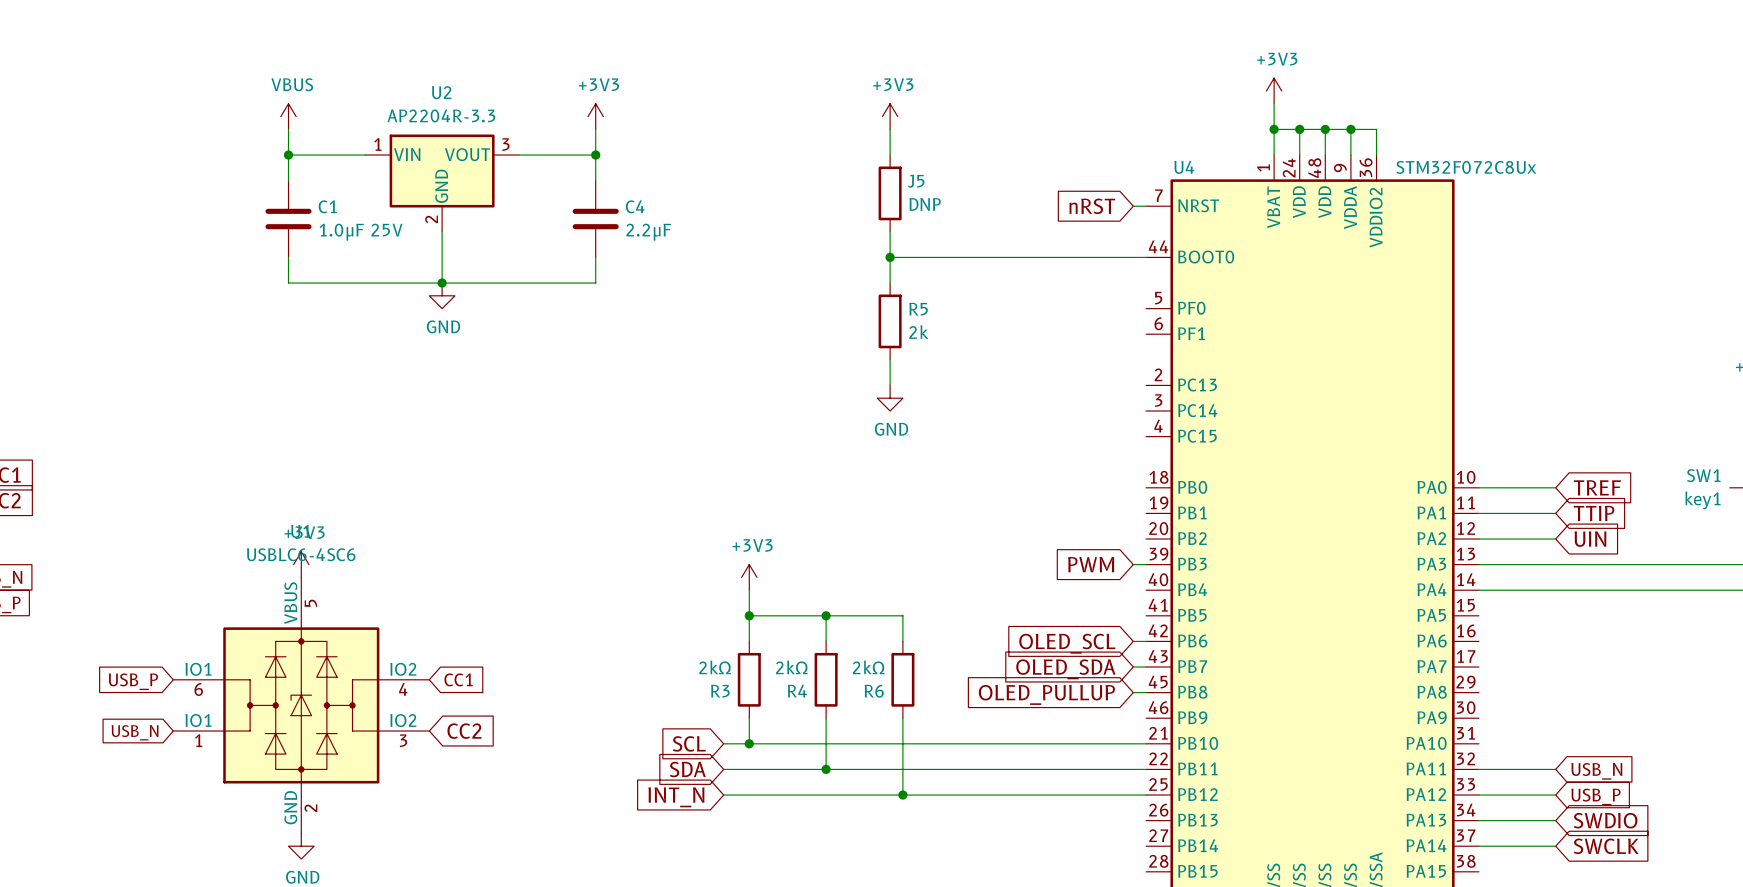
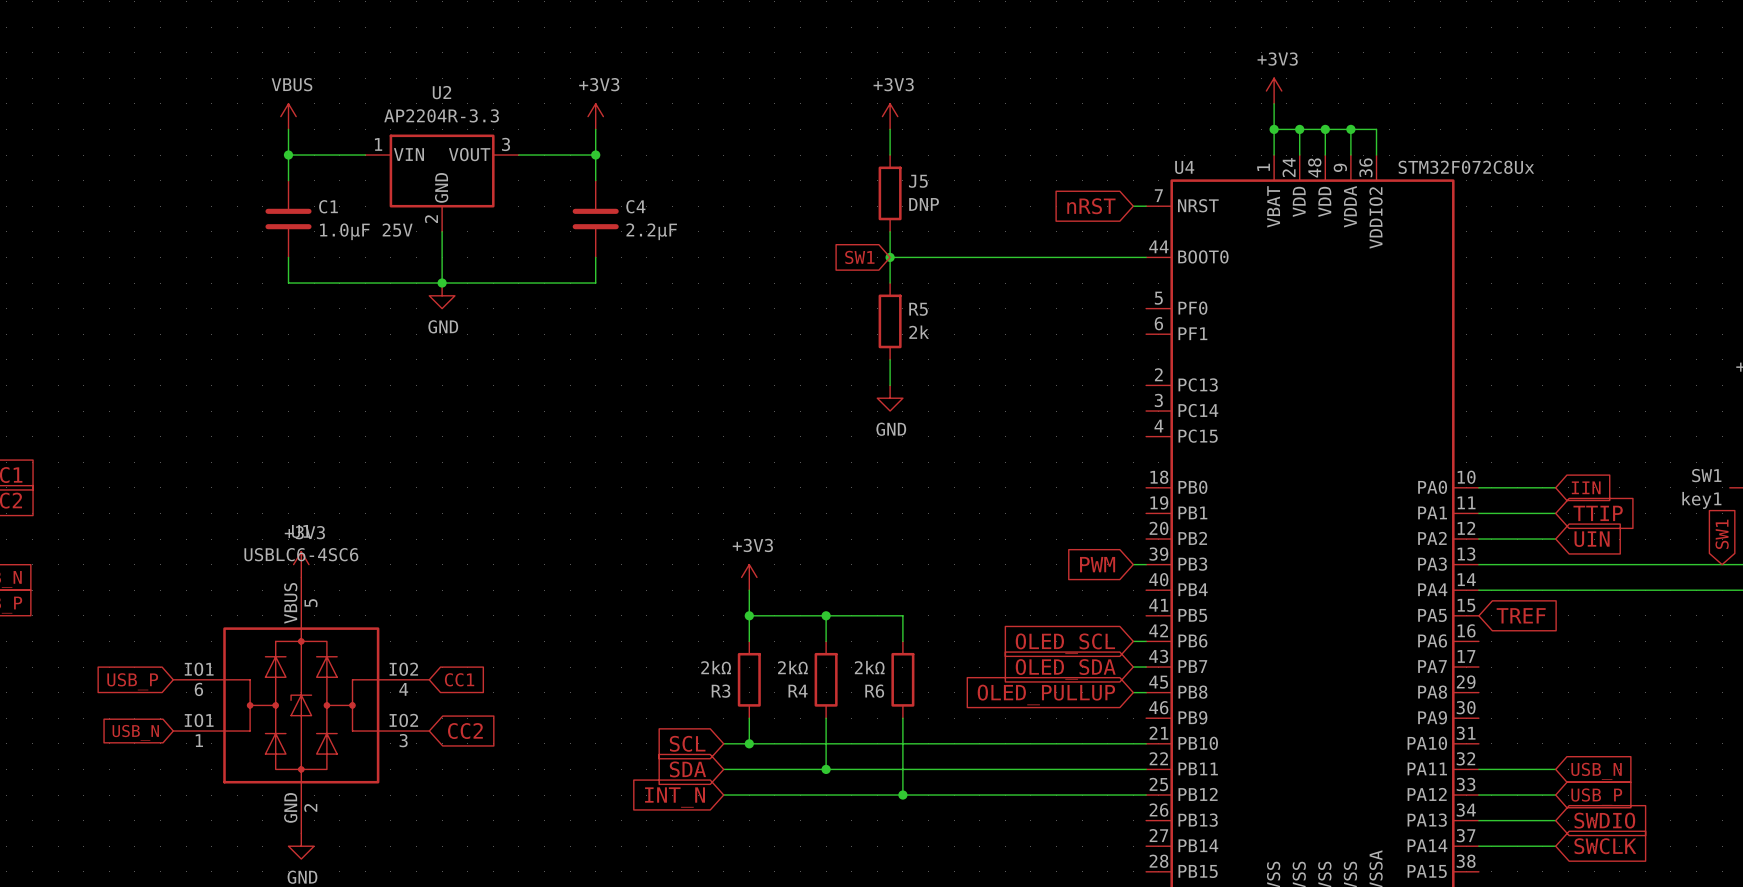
global label: none -> SW1 (859, 257)
global label: TREF (1597, 487) -> IIN (1586, 487)
global label: none -> SW1 (1722, 534)
global label: none -> TREF (1521, 615)

